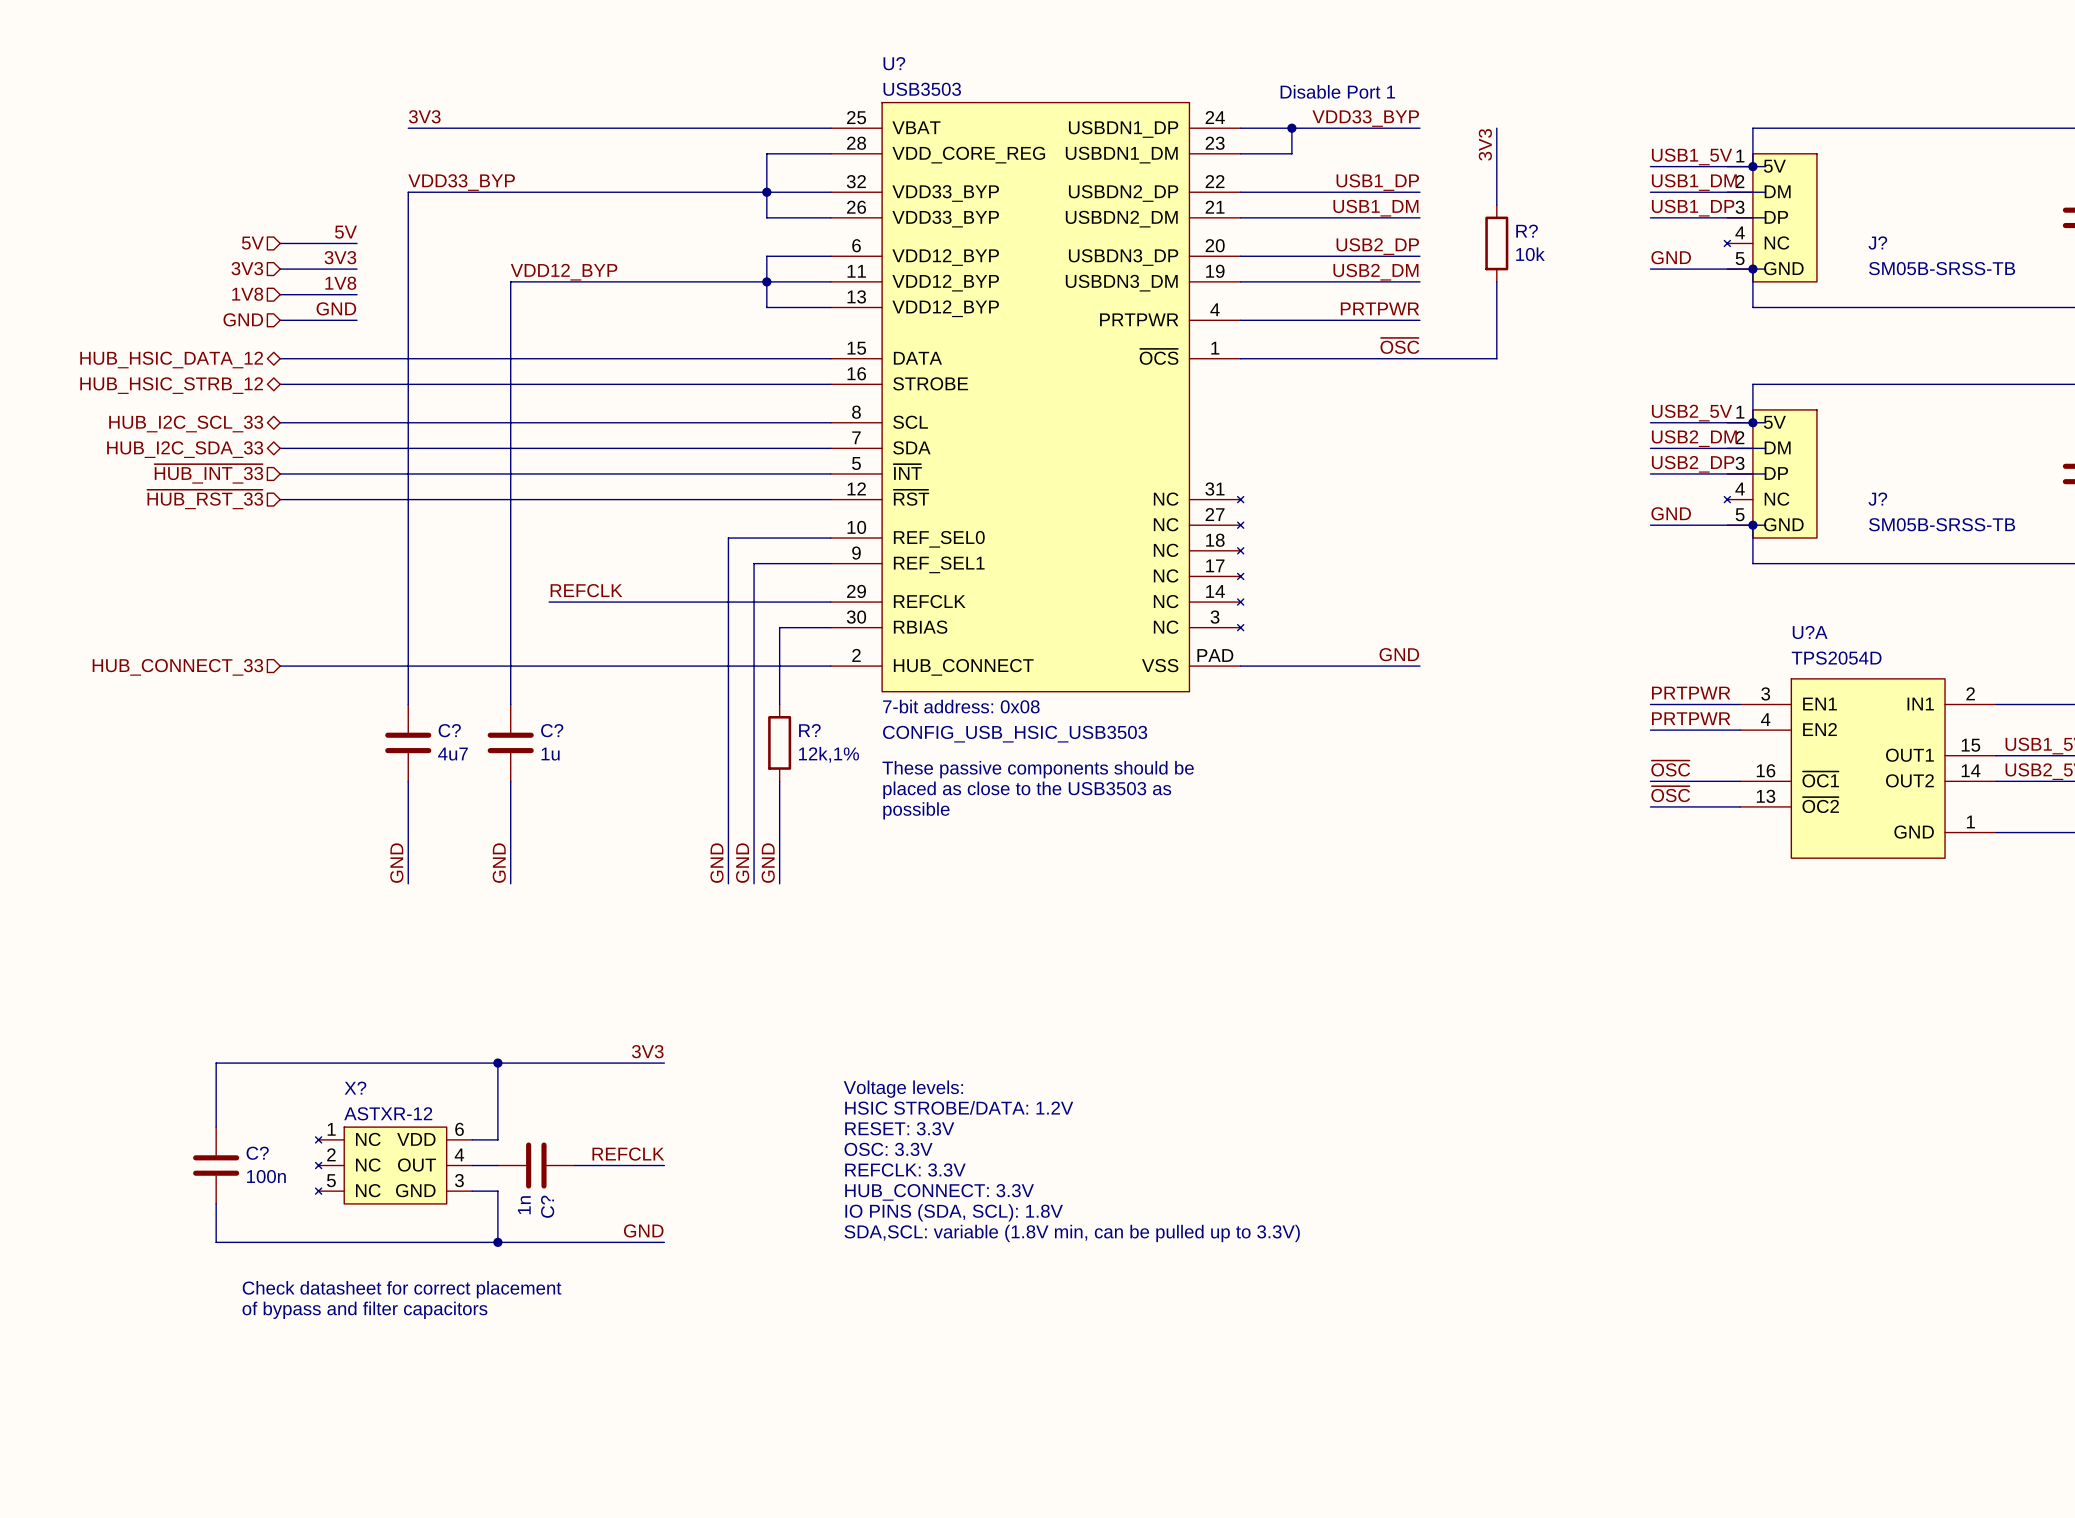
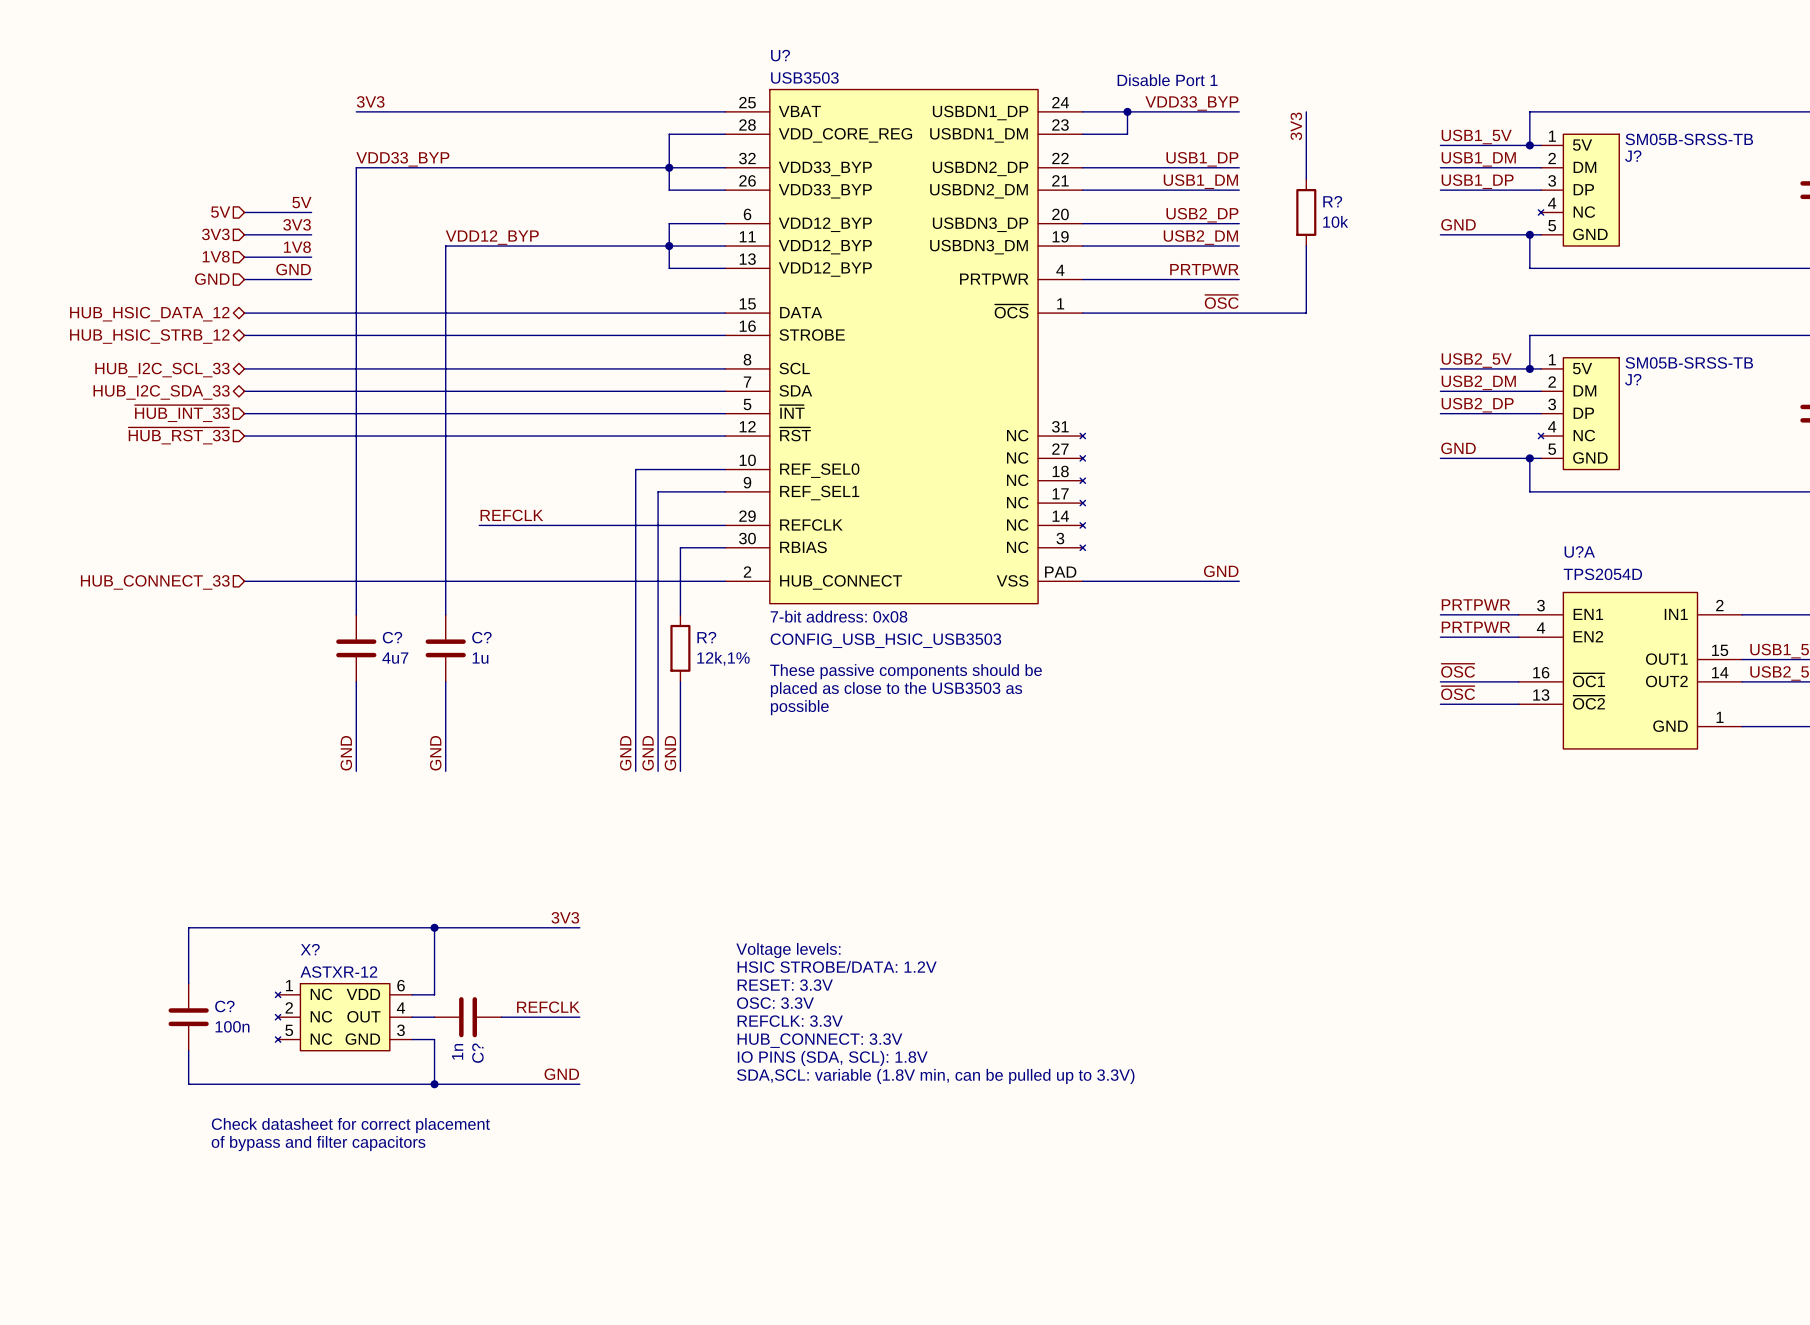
J? position: (1770, 217) -> (1578, 190)
J? name position: J? (1877, 242) -> J? (1633, 156)
J? value position: SM05B-SRSS-TB (1942, 268) -> SM05B-SRSS-TB (1689, 139)
J? position: (1770, 473) -> (1578, 413)
J? name position: J? (1877, 499) -> J? (1633, 379)
J? value position: SM05B-SRSS-TB (1942, 524) -> SM05B-SRSS-TB (1689, 362)

